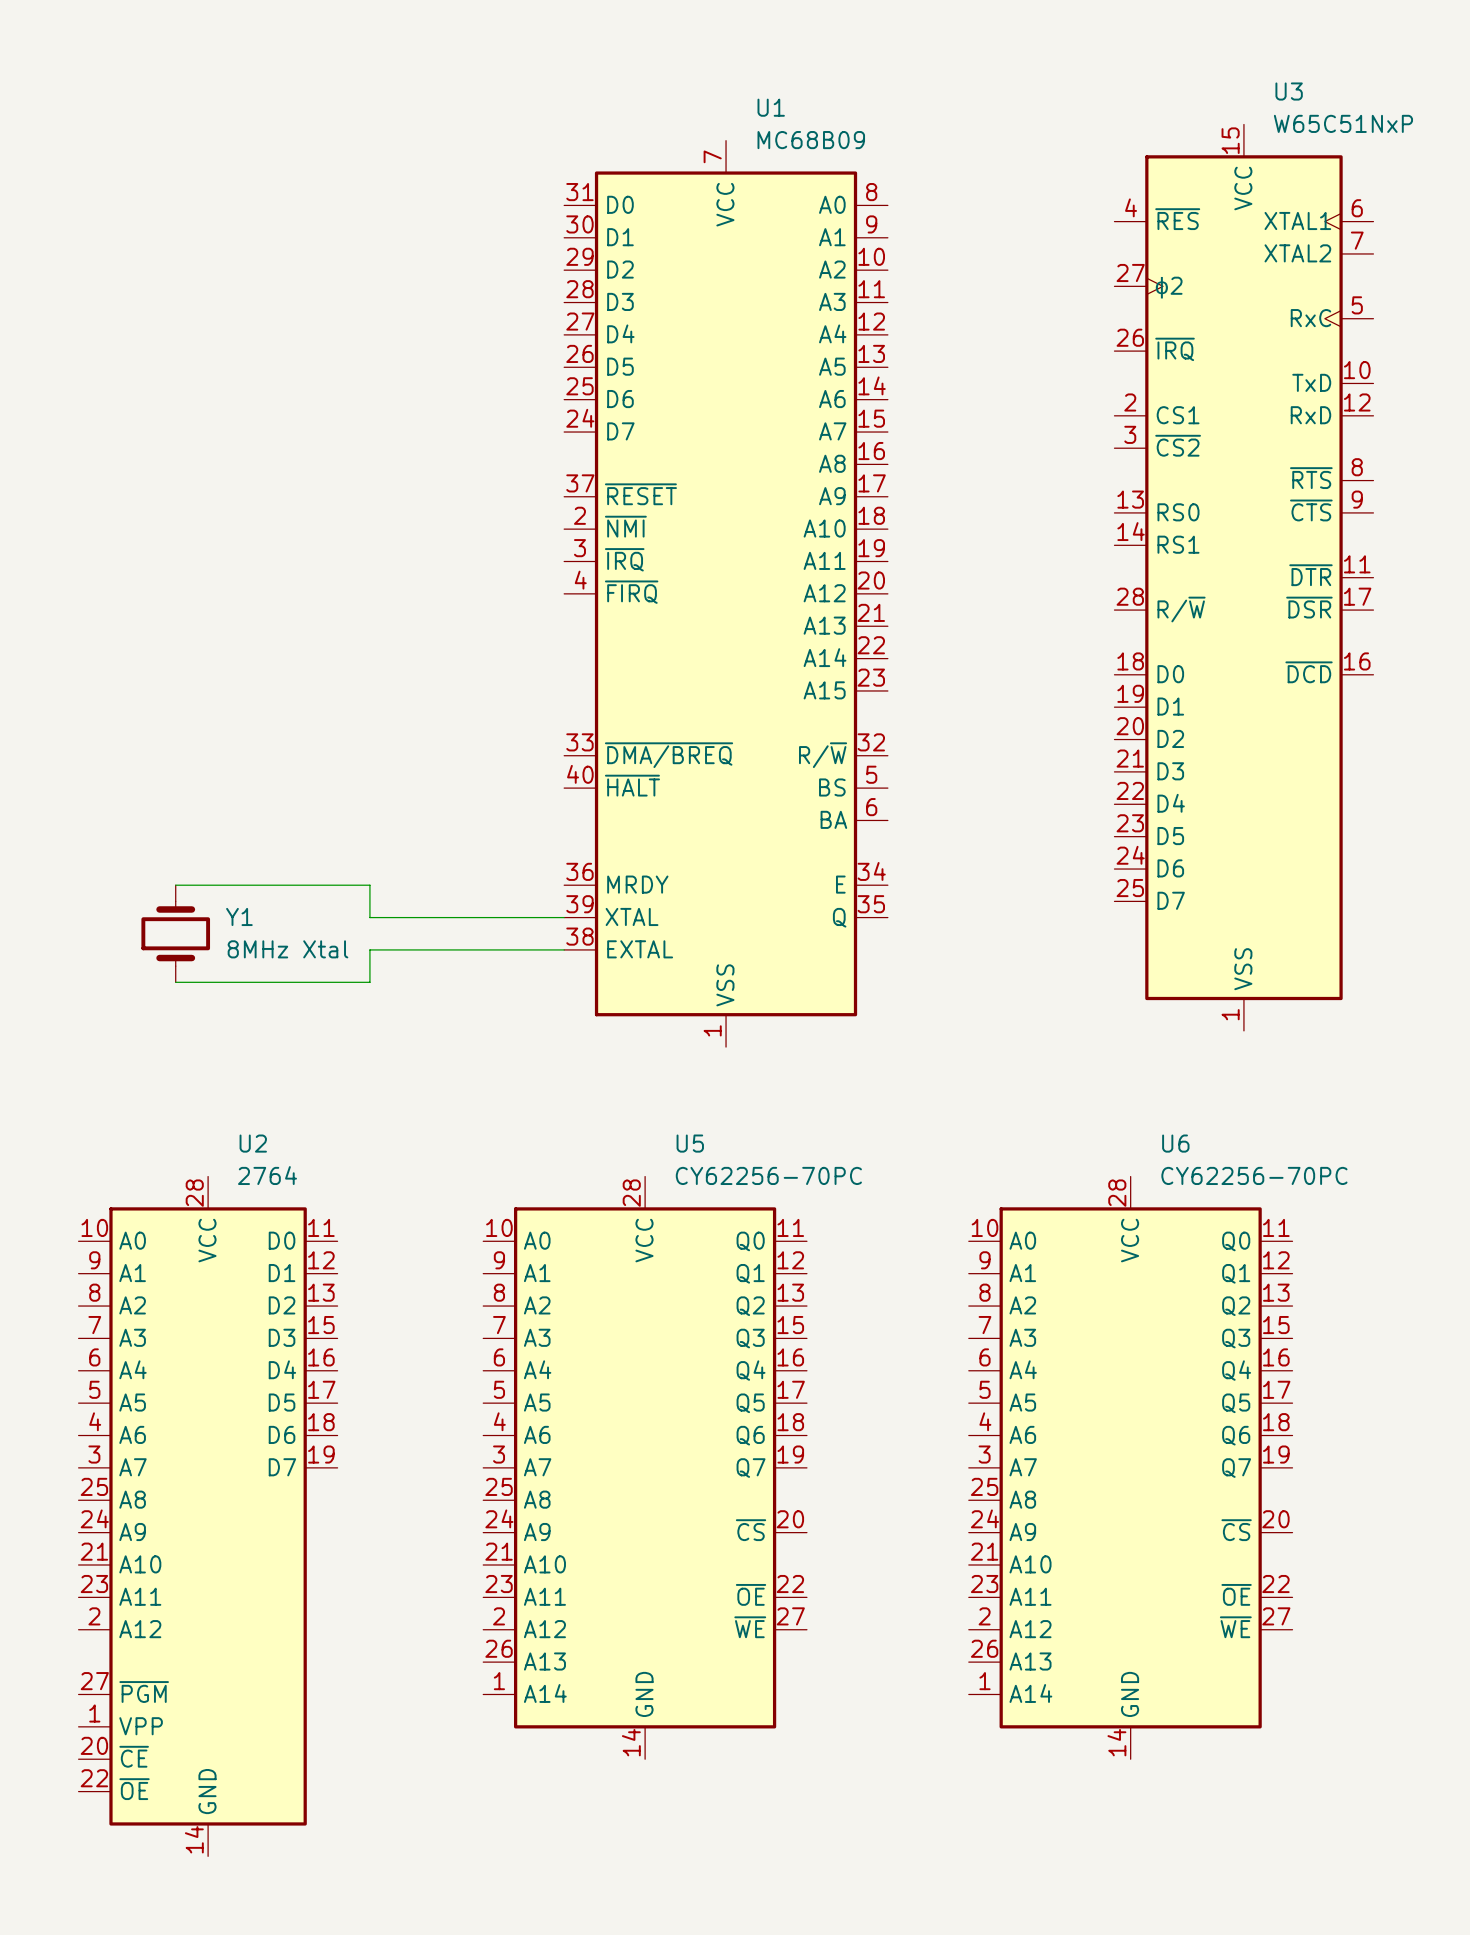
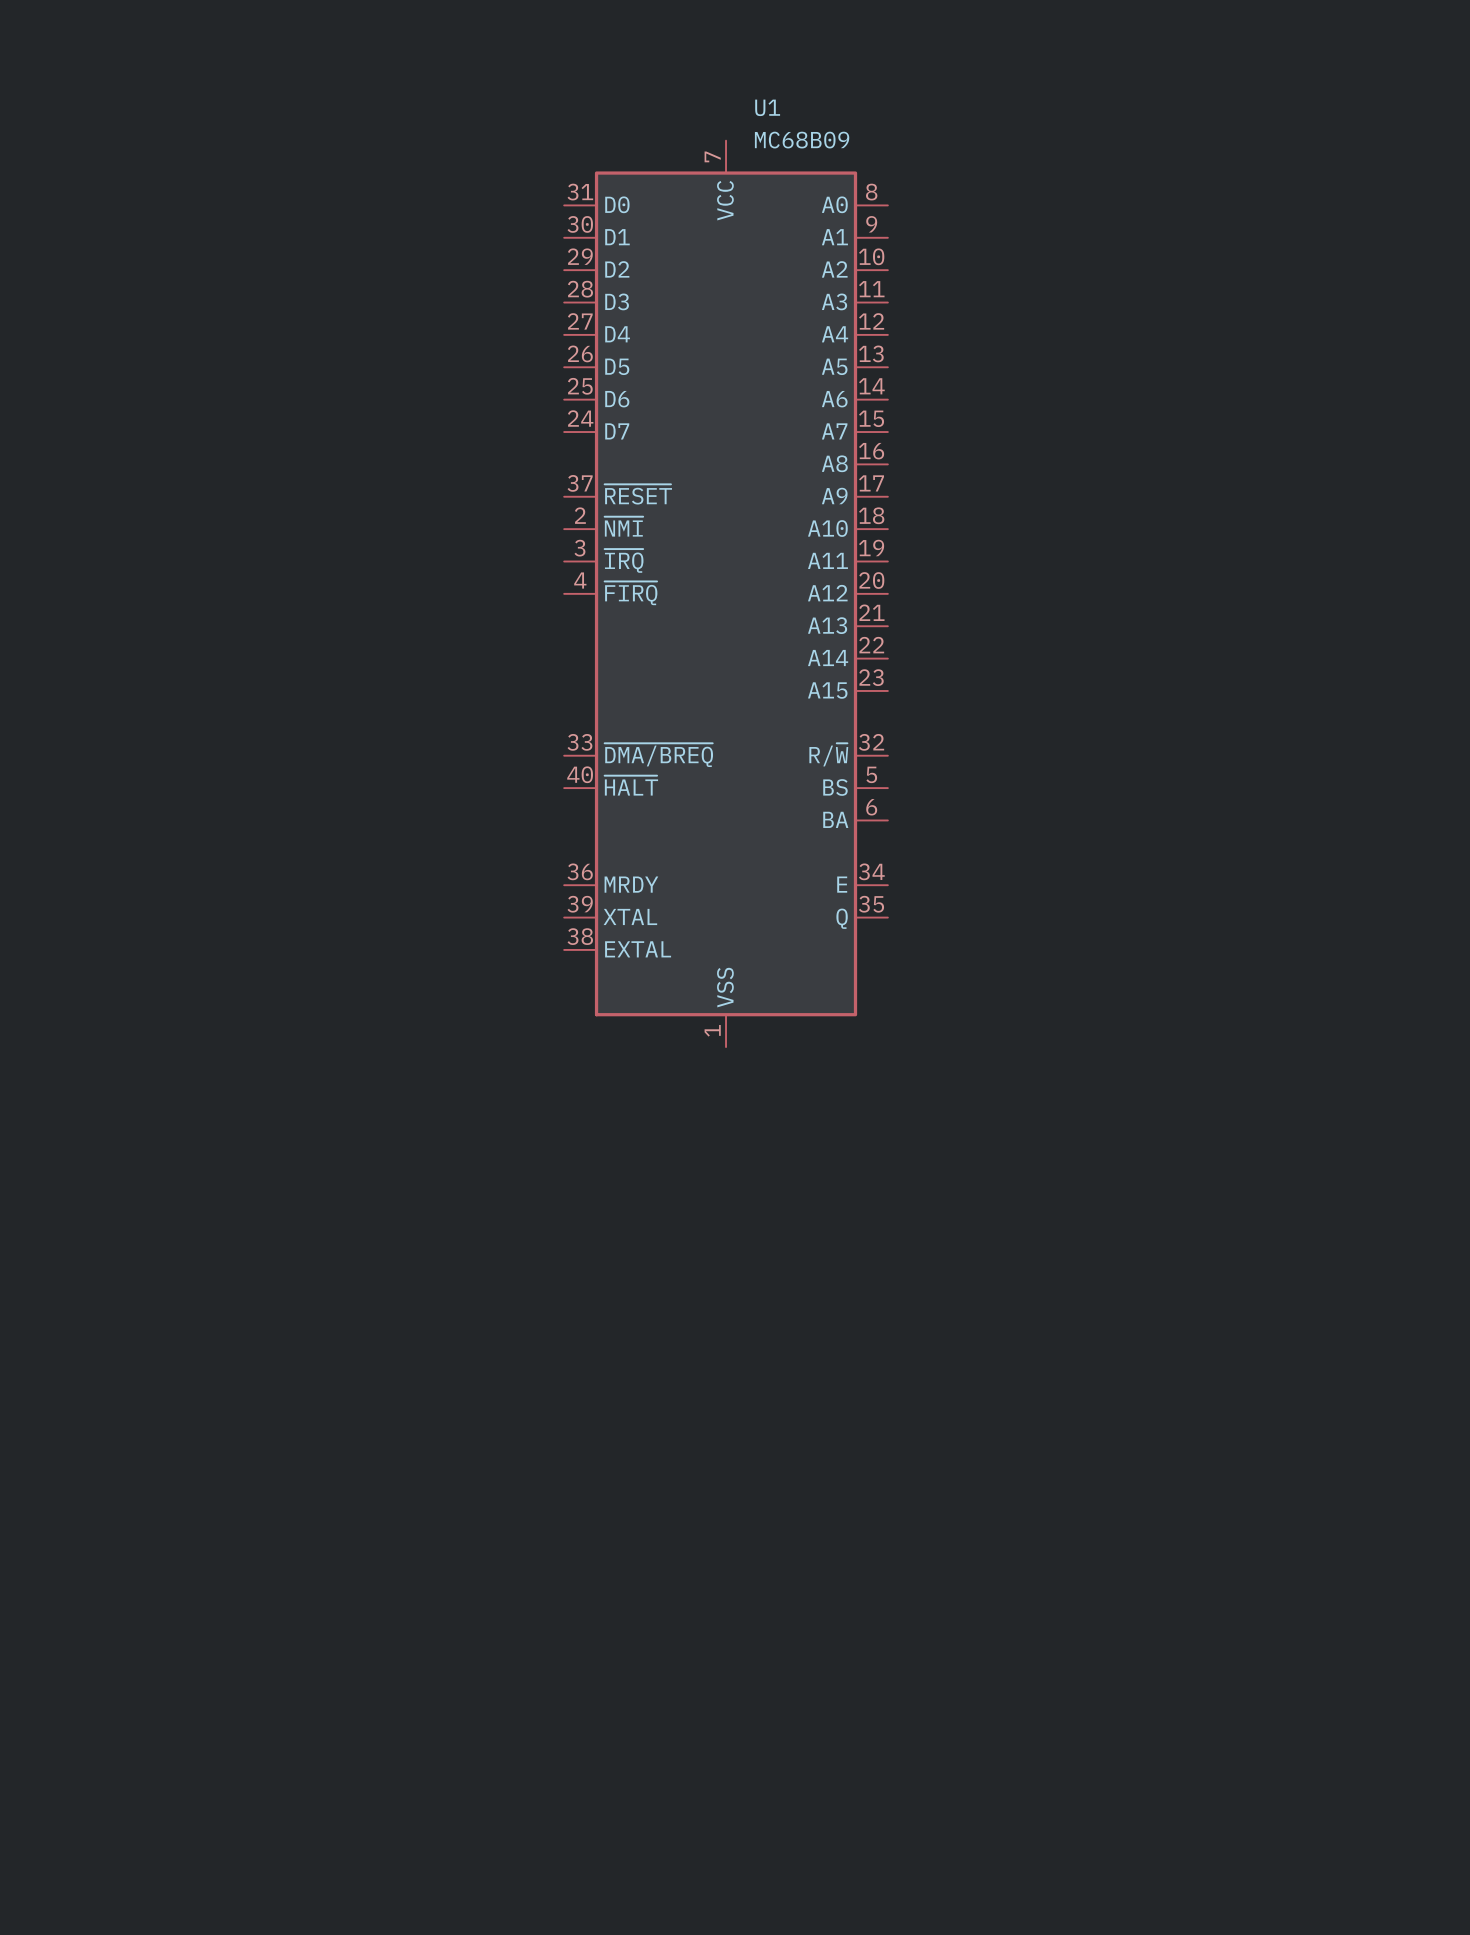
U3: W65C51NxP (1243, 577) -> none
wire: (175, 885) (369, 885) (369, 917) (564, 917) -> none
Y1: 8MHz Xtal (175, 933) -> none
wire: (564, 949) (369, 949) (369, 982) (175, 982) -> none
U5: CY62256-70PC (645, 1467) -> none
U6: CY62256-70PC (1130, 1467) -> none
U2: 2764 (208, 1516) -> none

